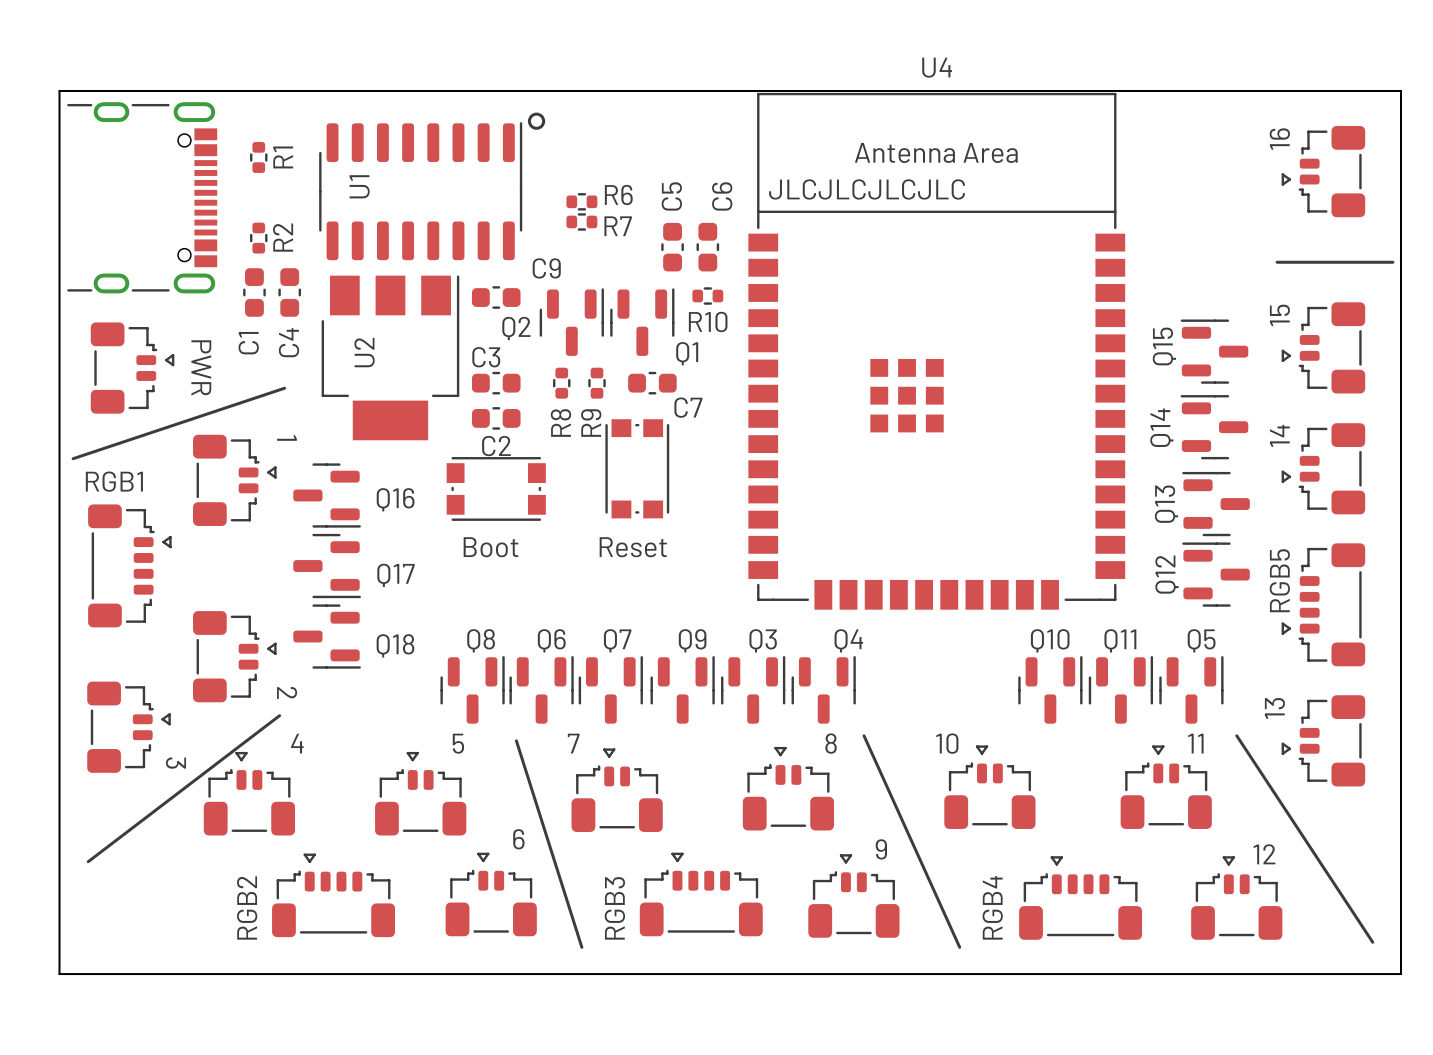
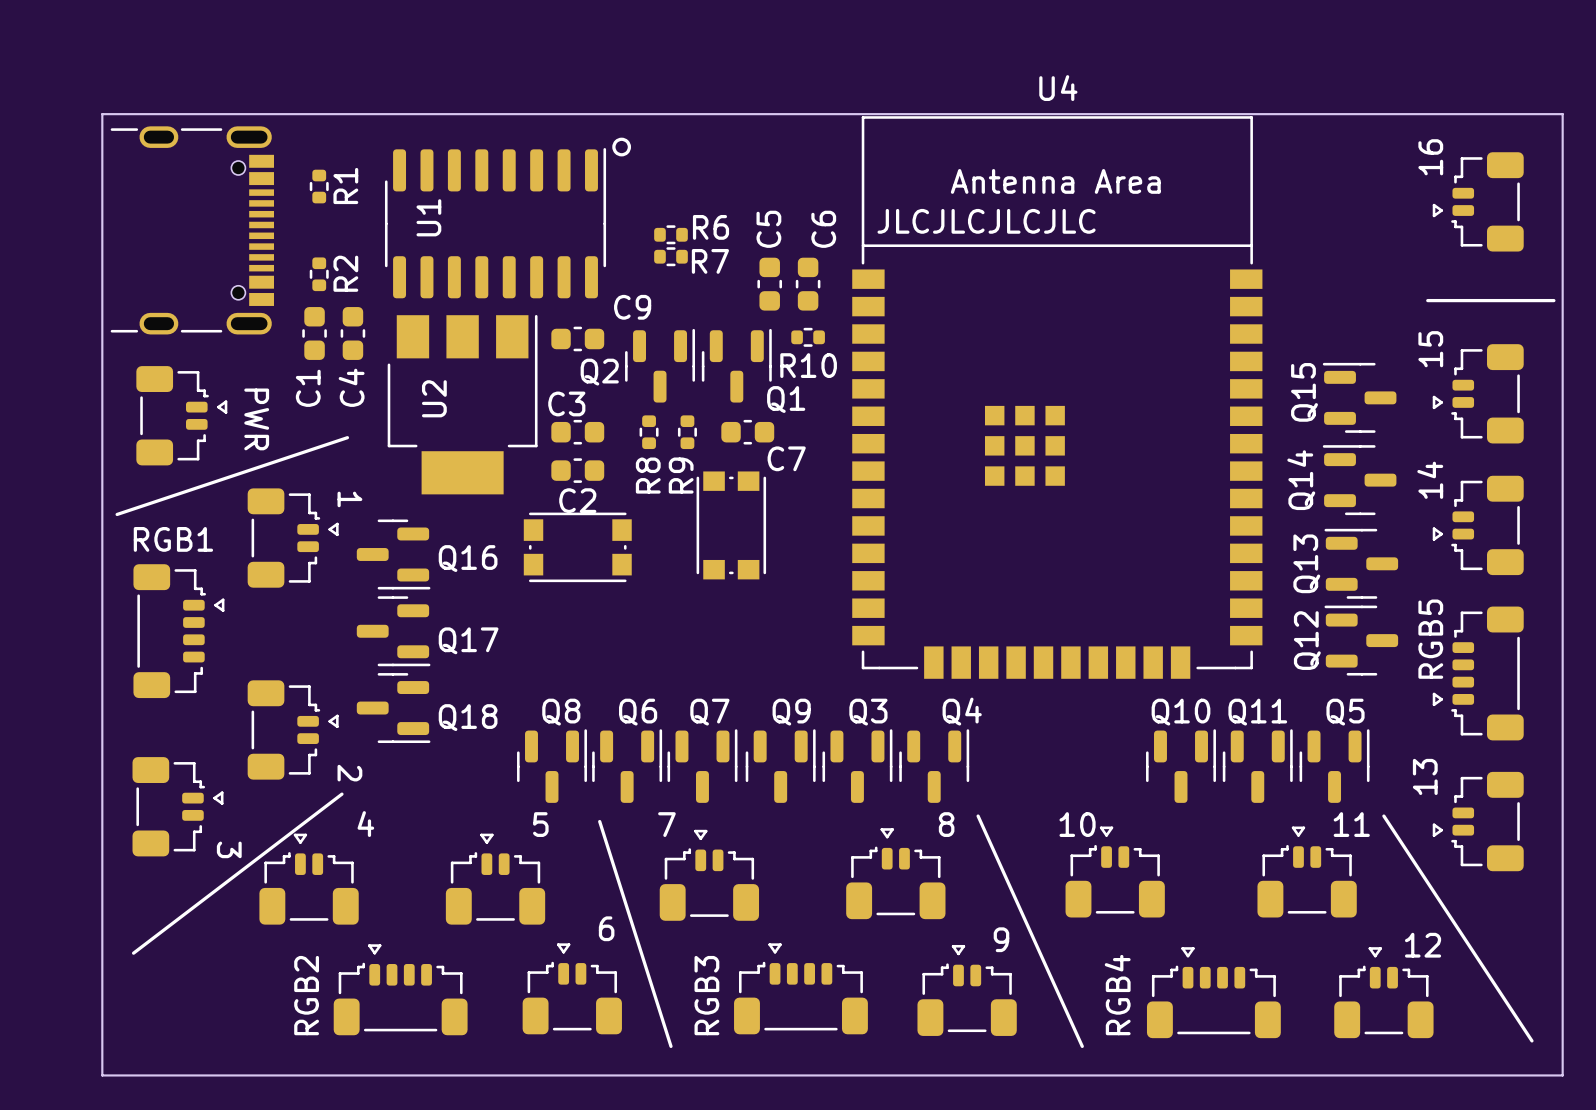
text: Boot (490, 547) -> none
text: Reset (633, 547) -> none

